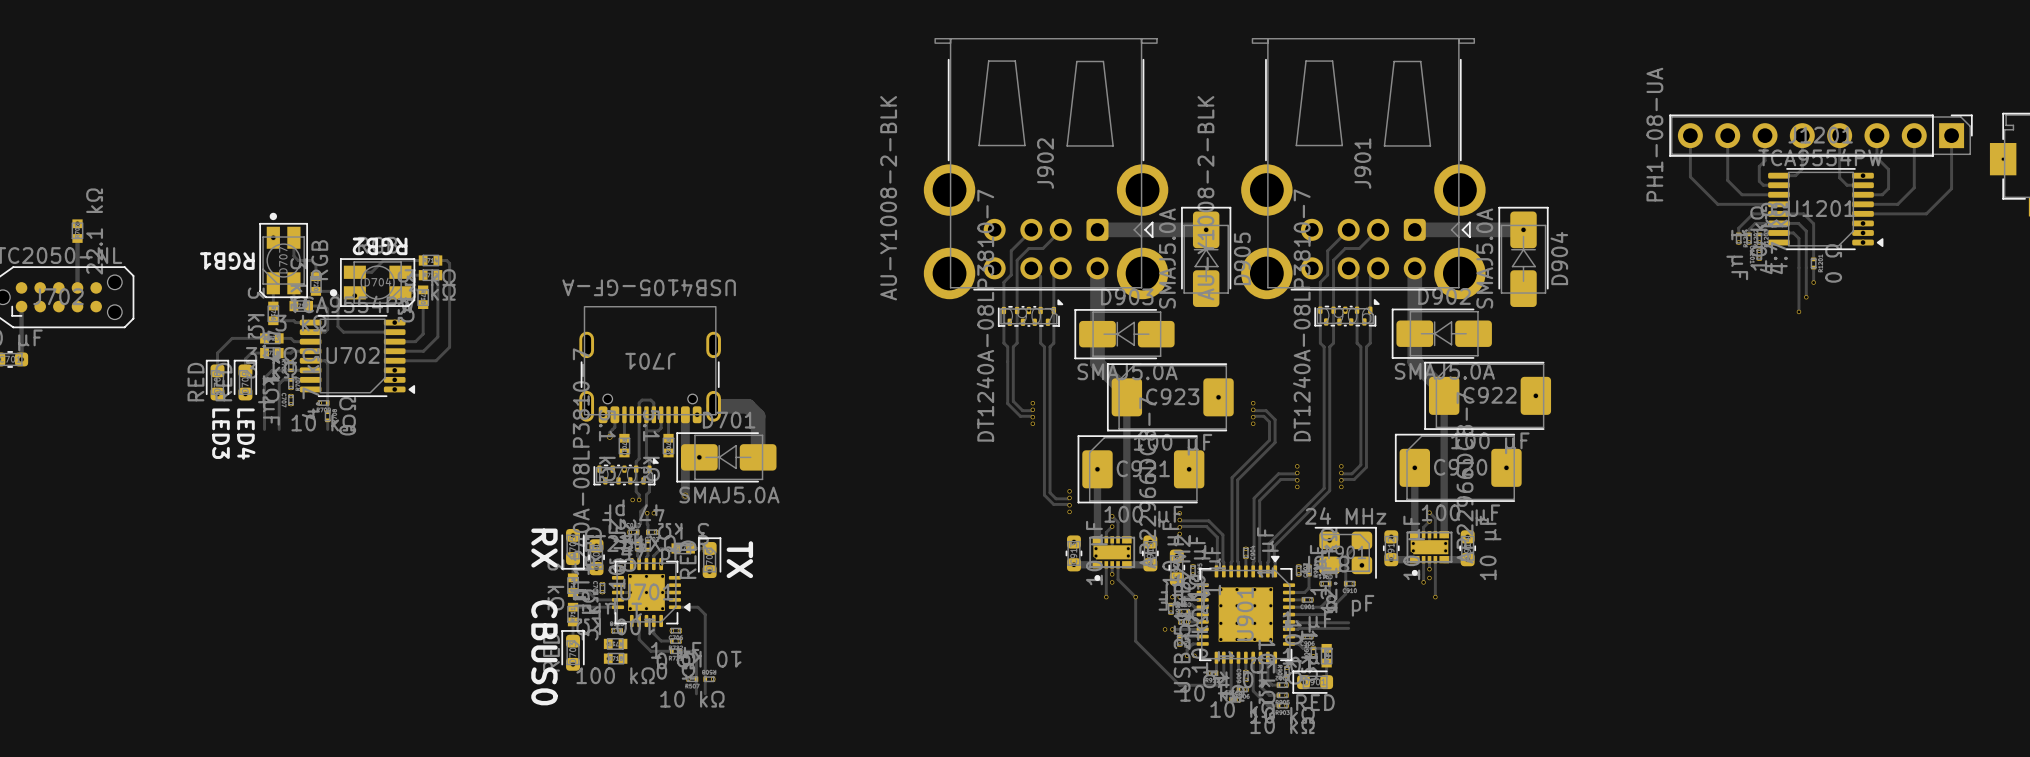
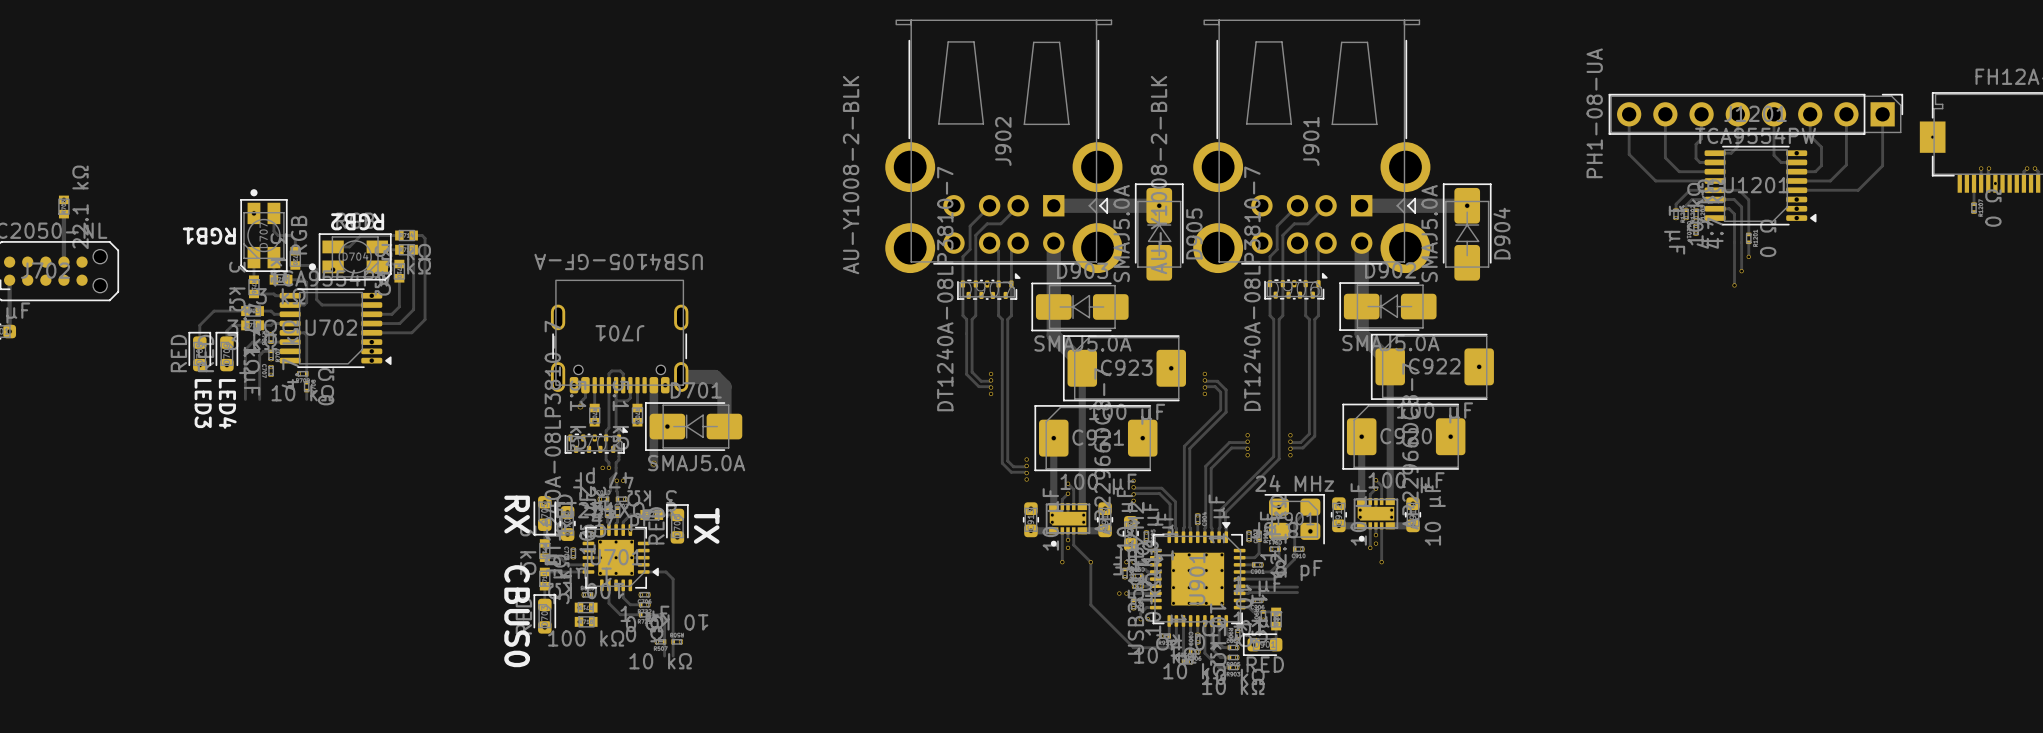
J902 footprint: [923, 37, 1169, 300] -> [885, 19, 1123, 274]
J901 footprint: [1241, 37, 1486, 300] -> [1193, 19, 1431, 274]

